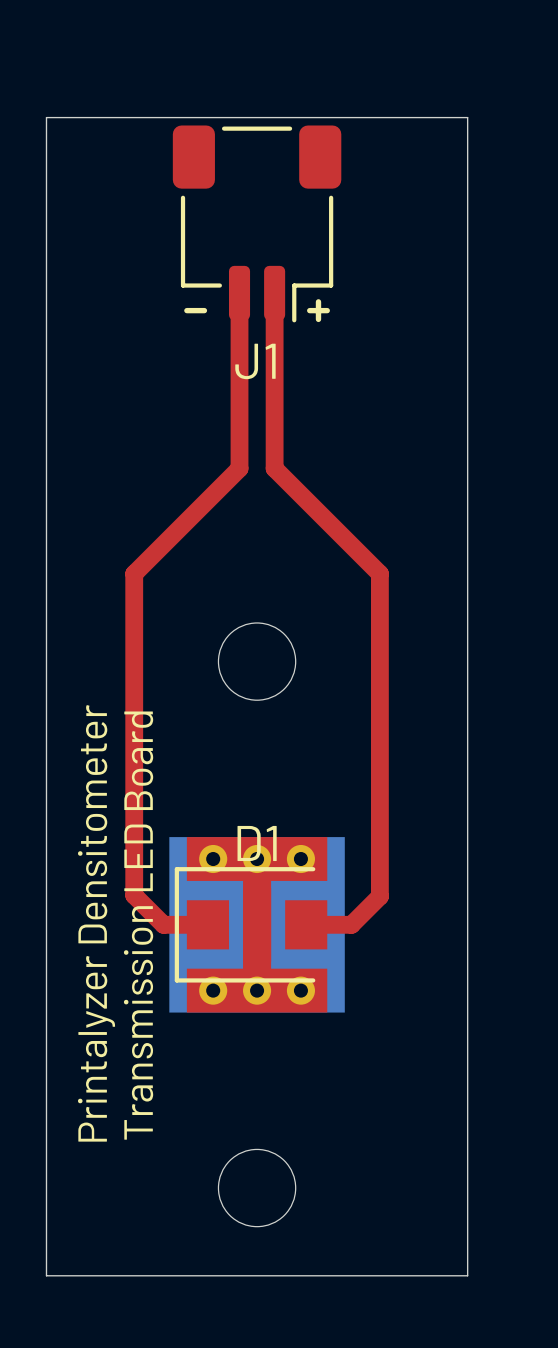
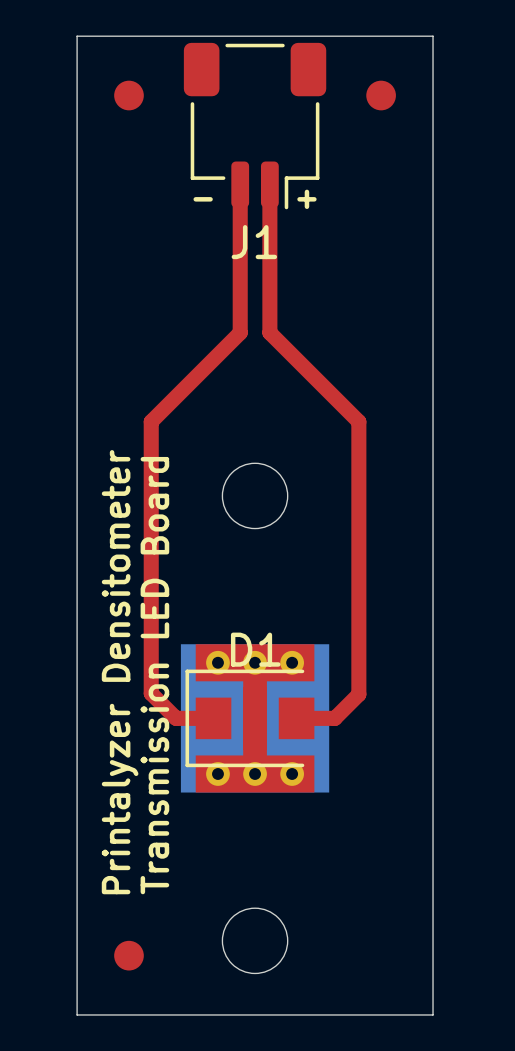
part: none -> (128, 95)
part: none -> (381, 95)
text position: Printalyzer Densitometer (96, 923) -> Printalyzer Densitometer (120, 672)
text position: Transmission LED Board (138, 925) -> Transmission LED Board (154, 675)
part: none -> (128, 955)

